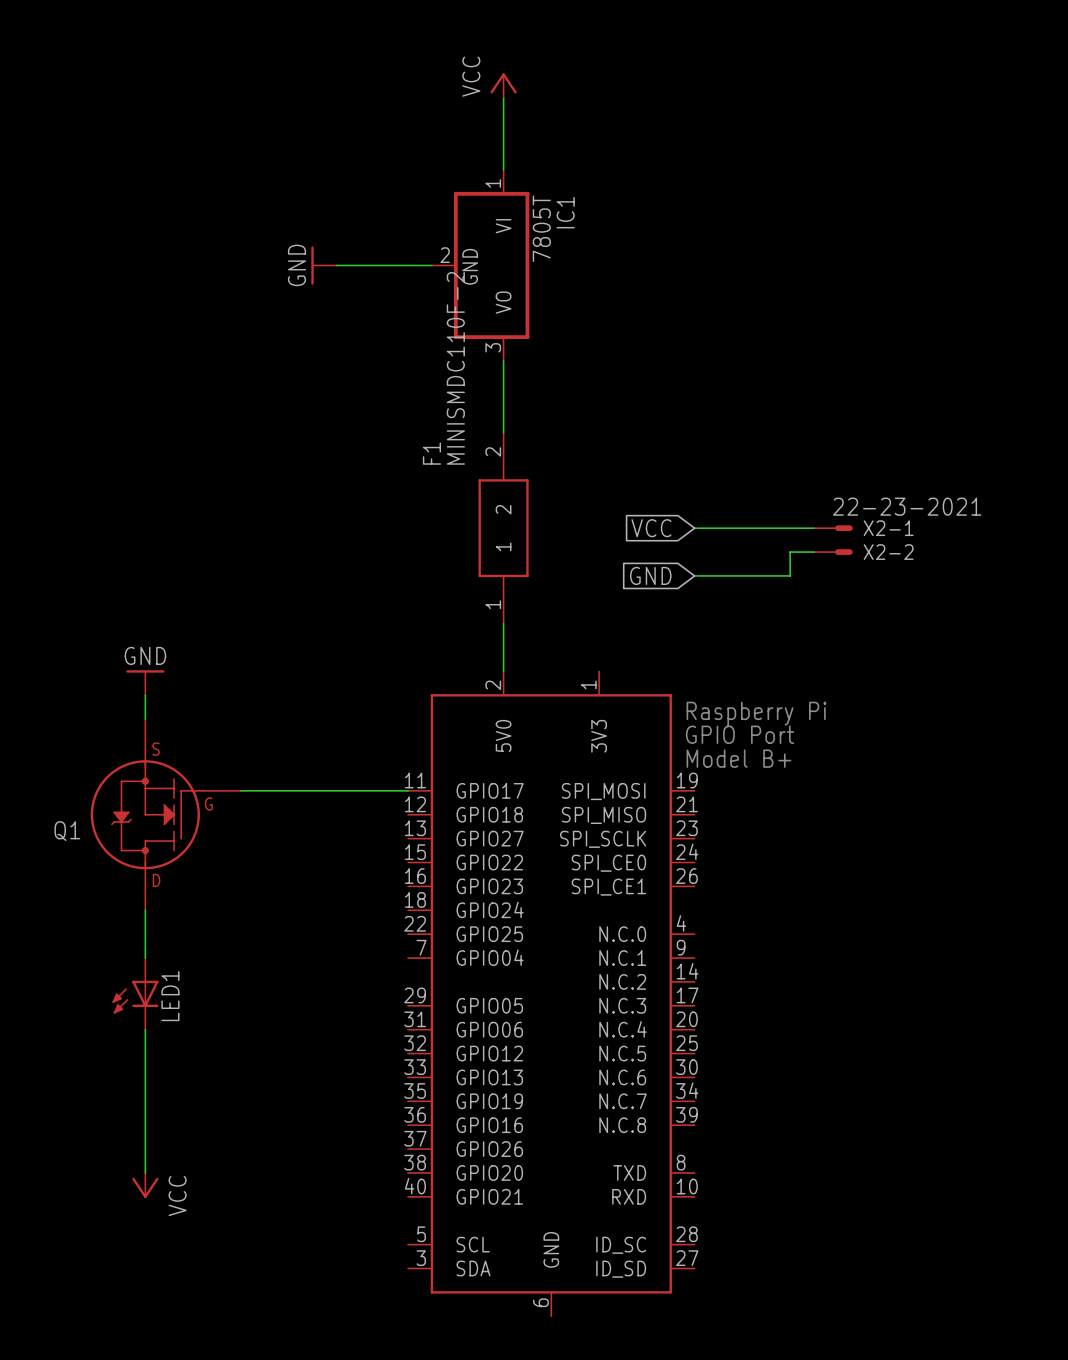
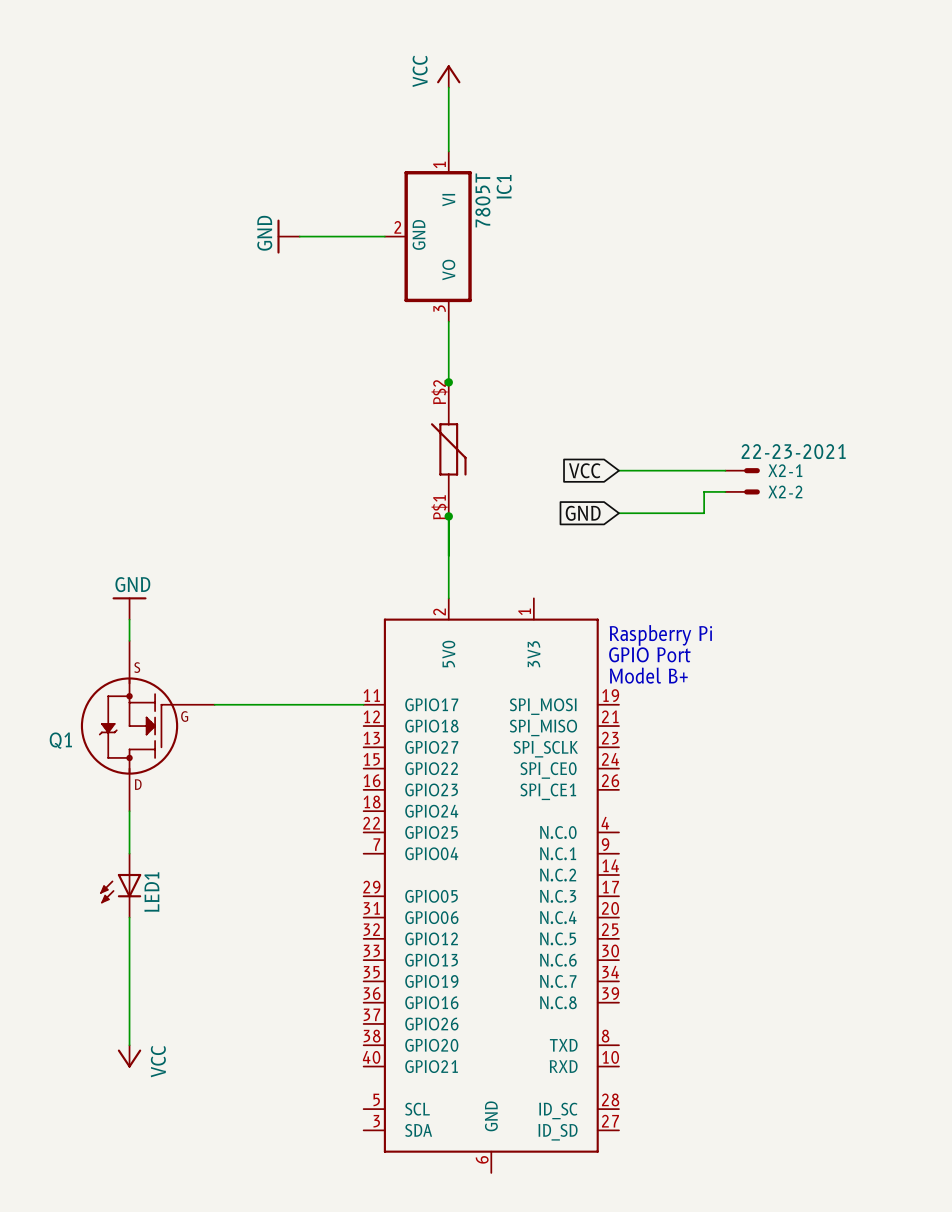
junction: none -> (448, 382)
part: none -> (448, 449)
F1: MINISMDC110F-2 (503, 528) -> none
junction: none -> (448, 516)

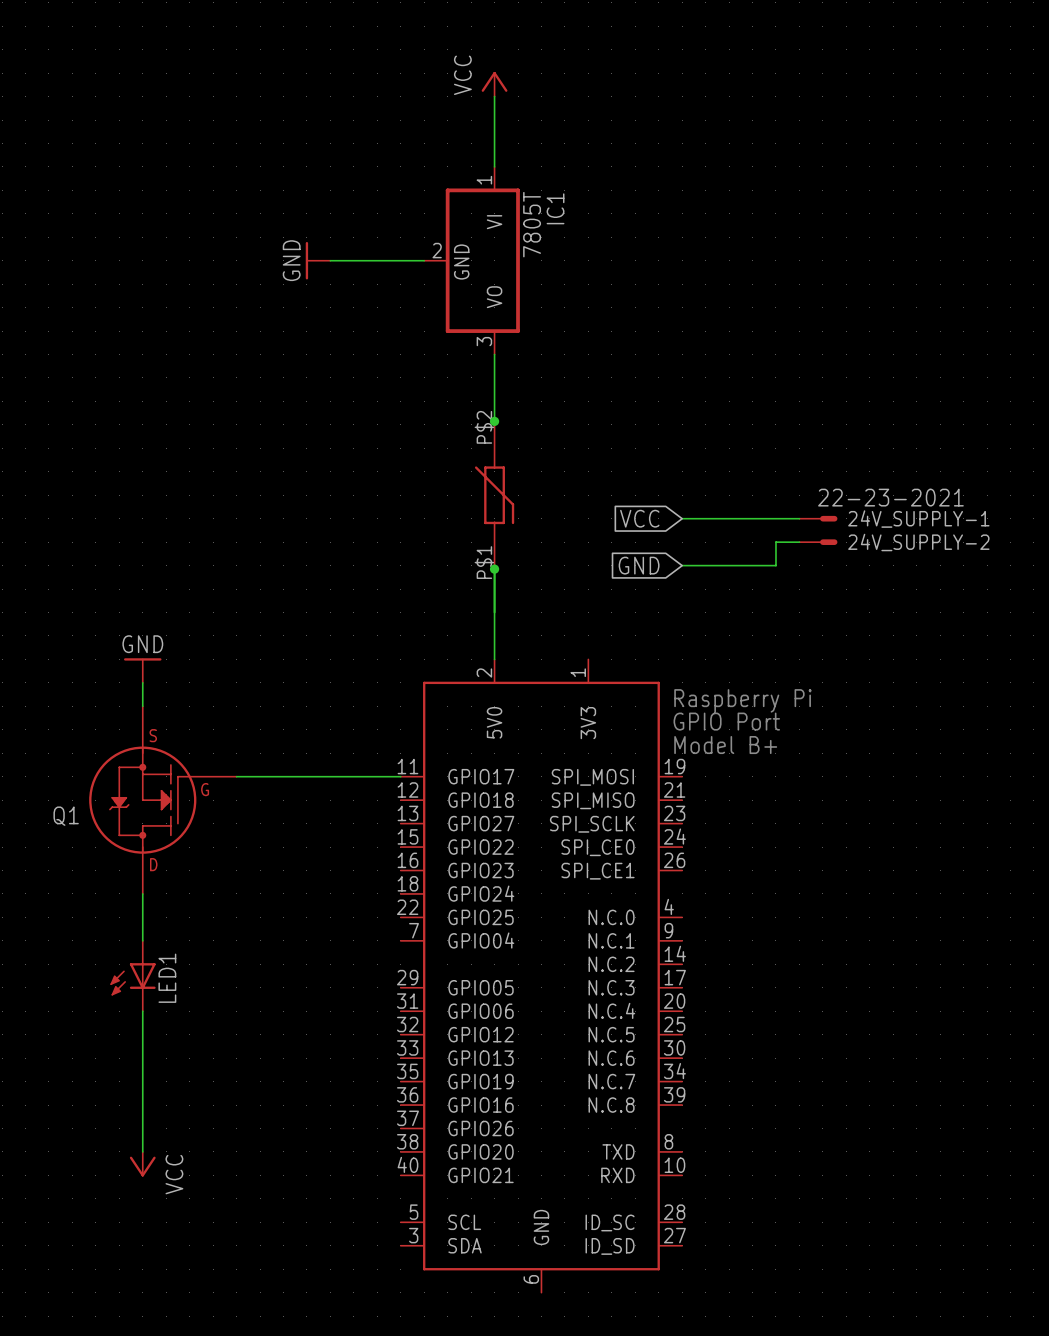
X2-1 name: X2-1 (785, 470) -> 24V_SUPPLY-1 (918, 519)
X2-2 name: X2-2 (785, 491) -> 24V_SUPPLY-2 (918, 542)

